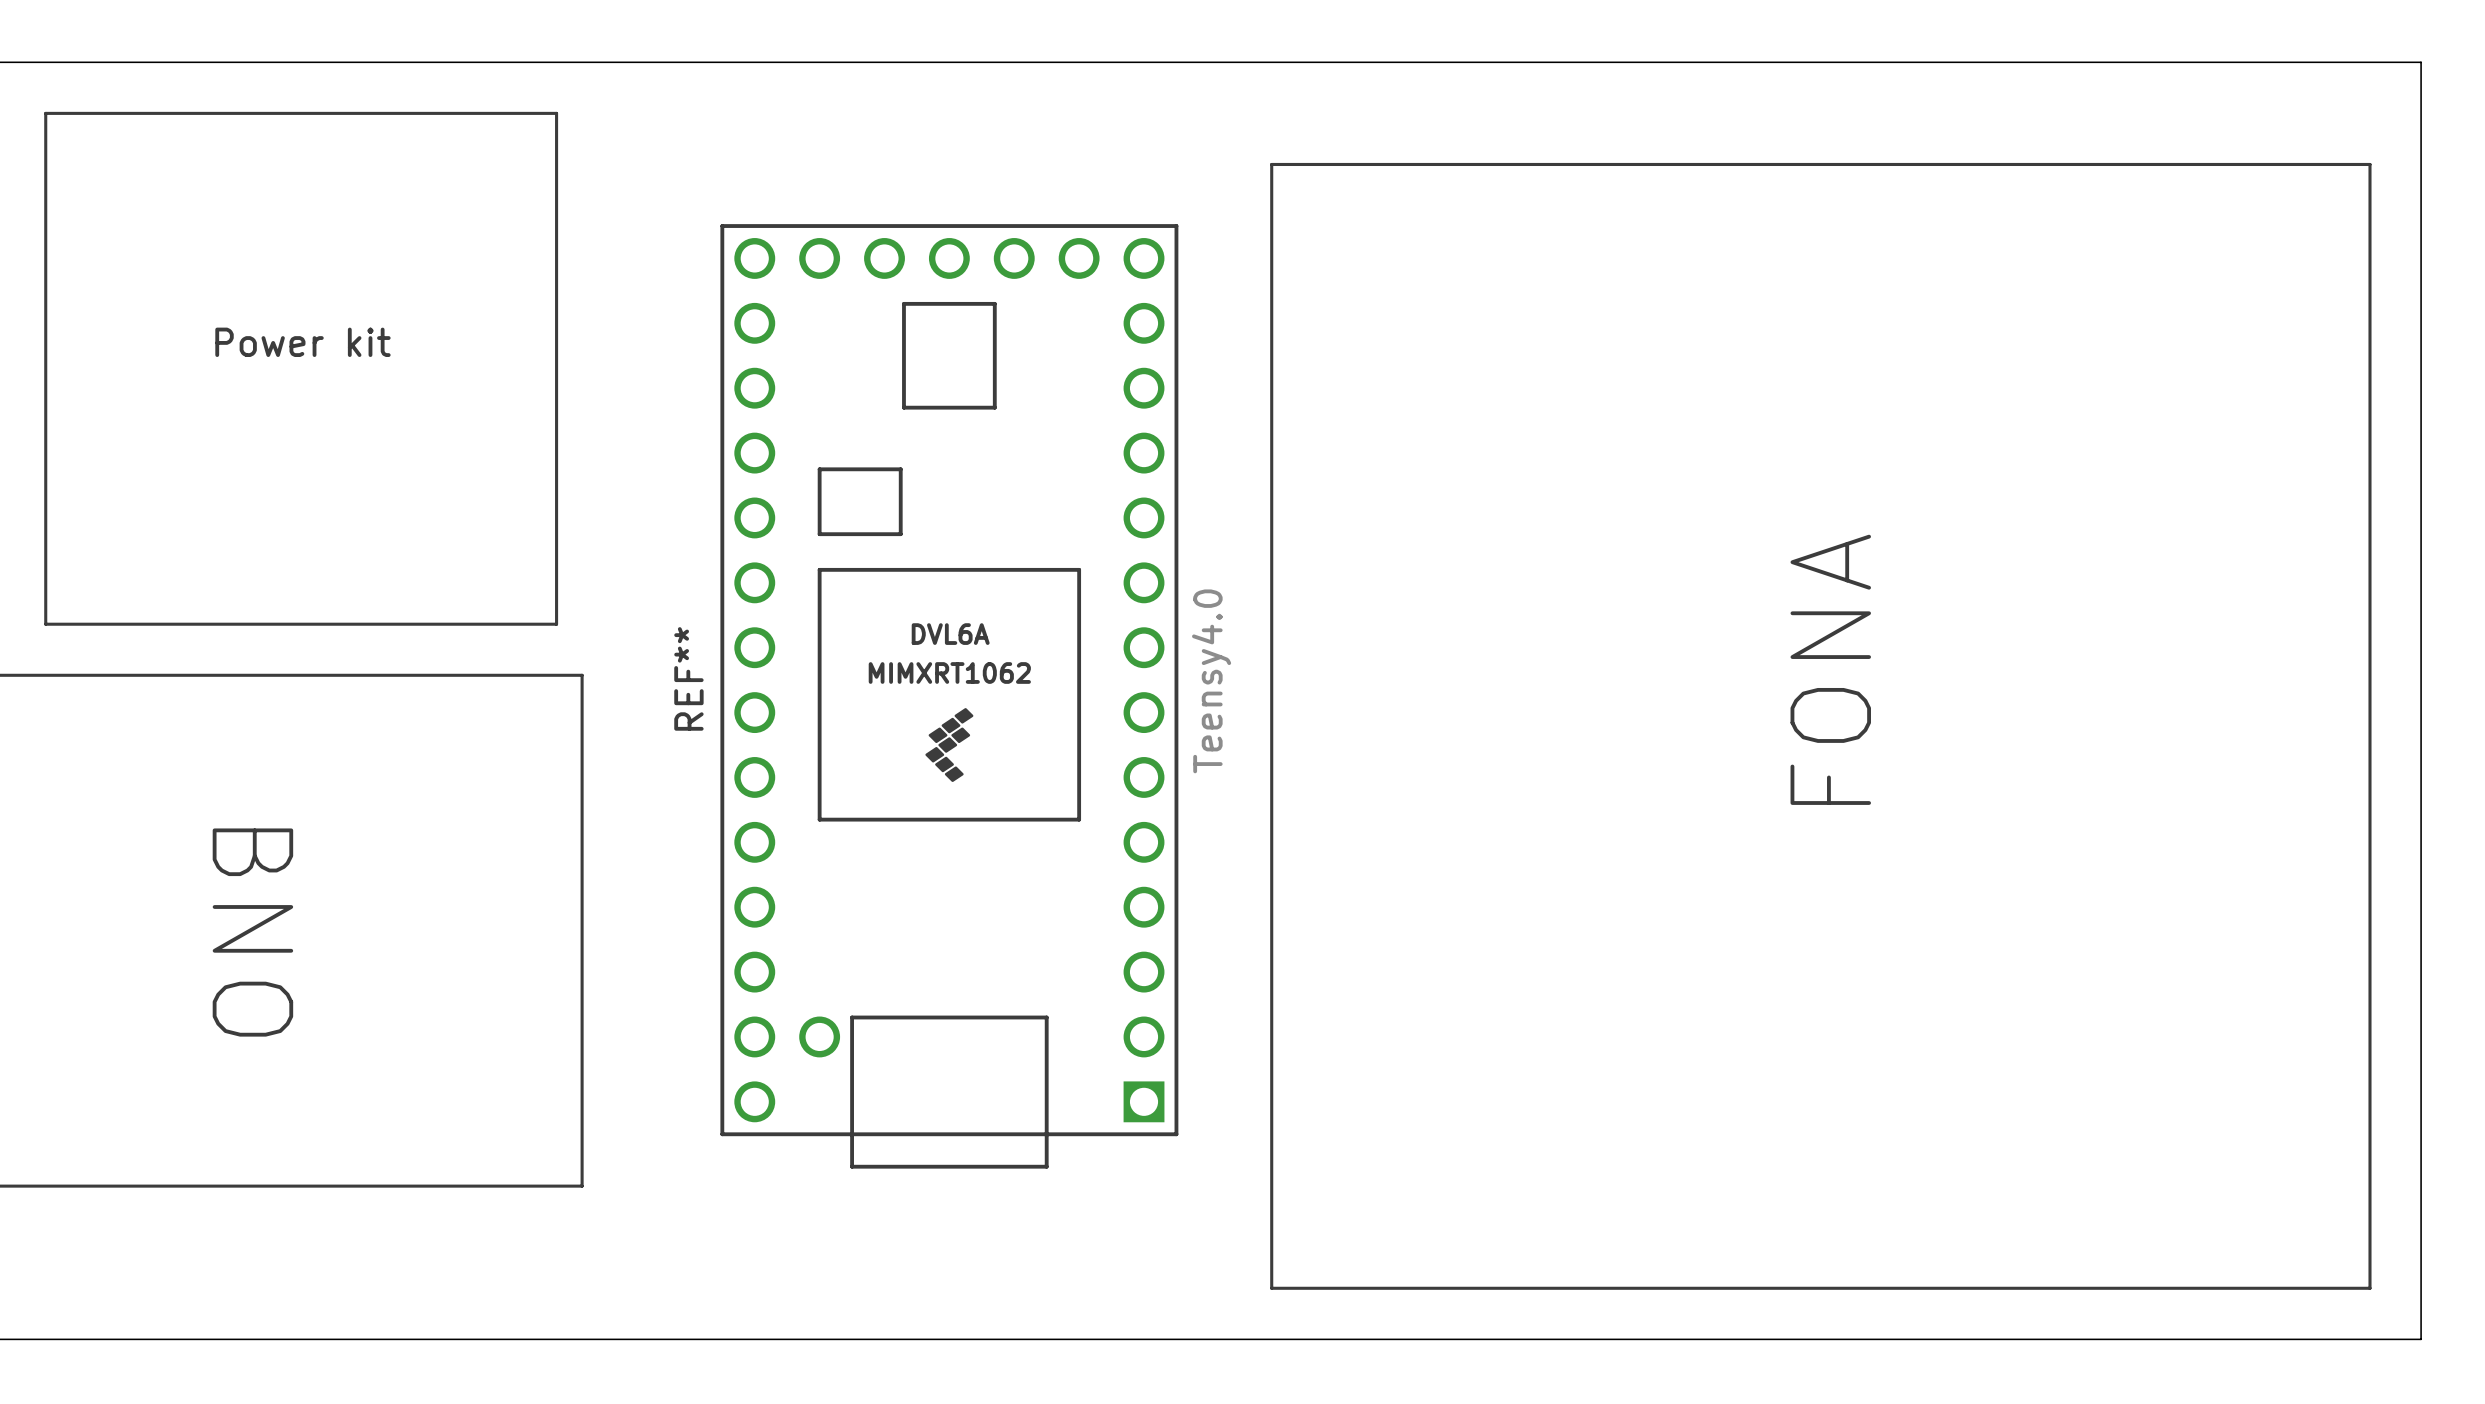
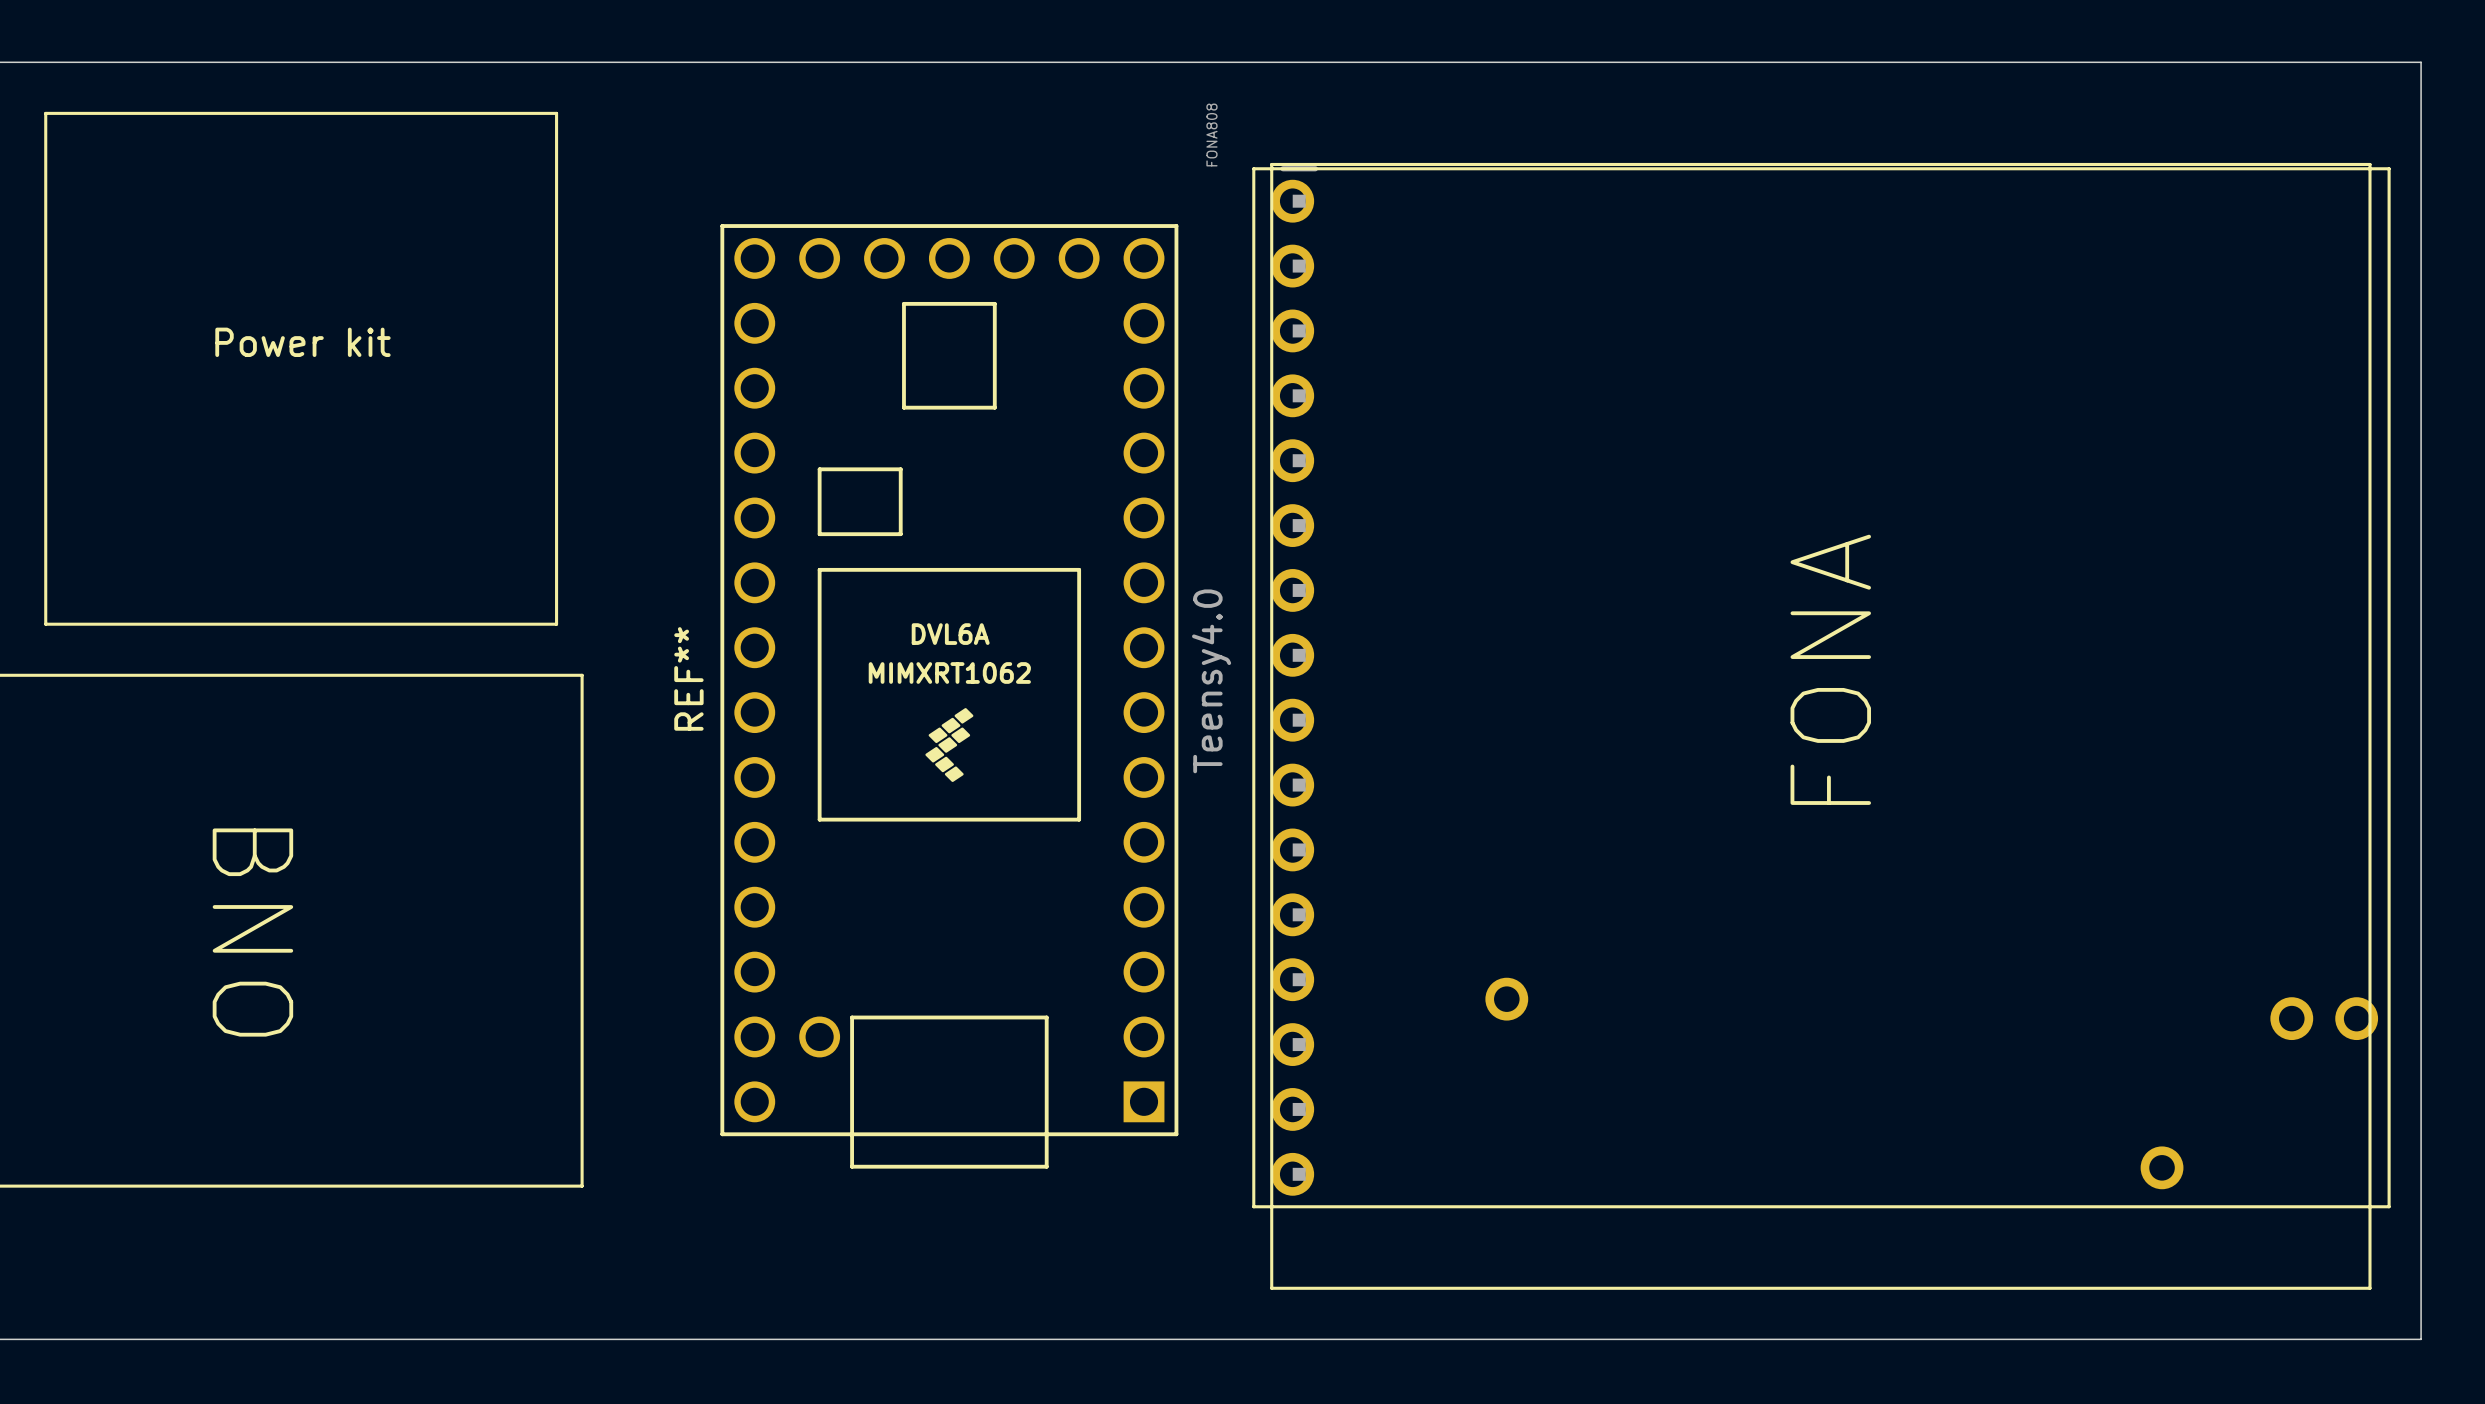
part: none -> FONA808 (1821, 687)

